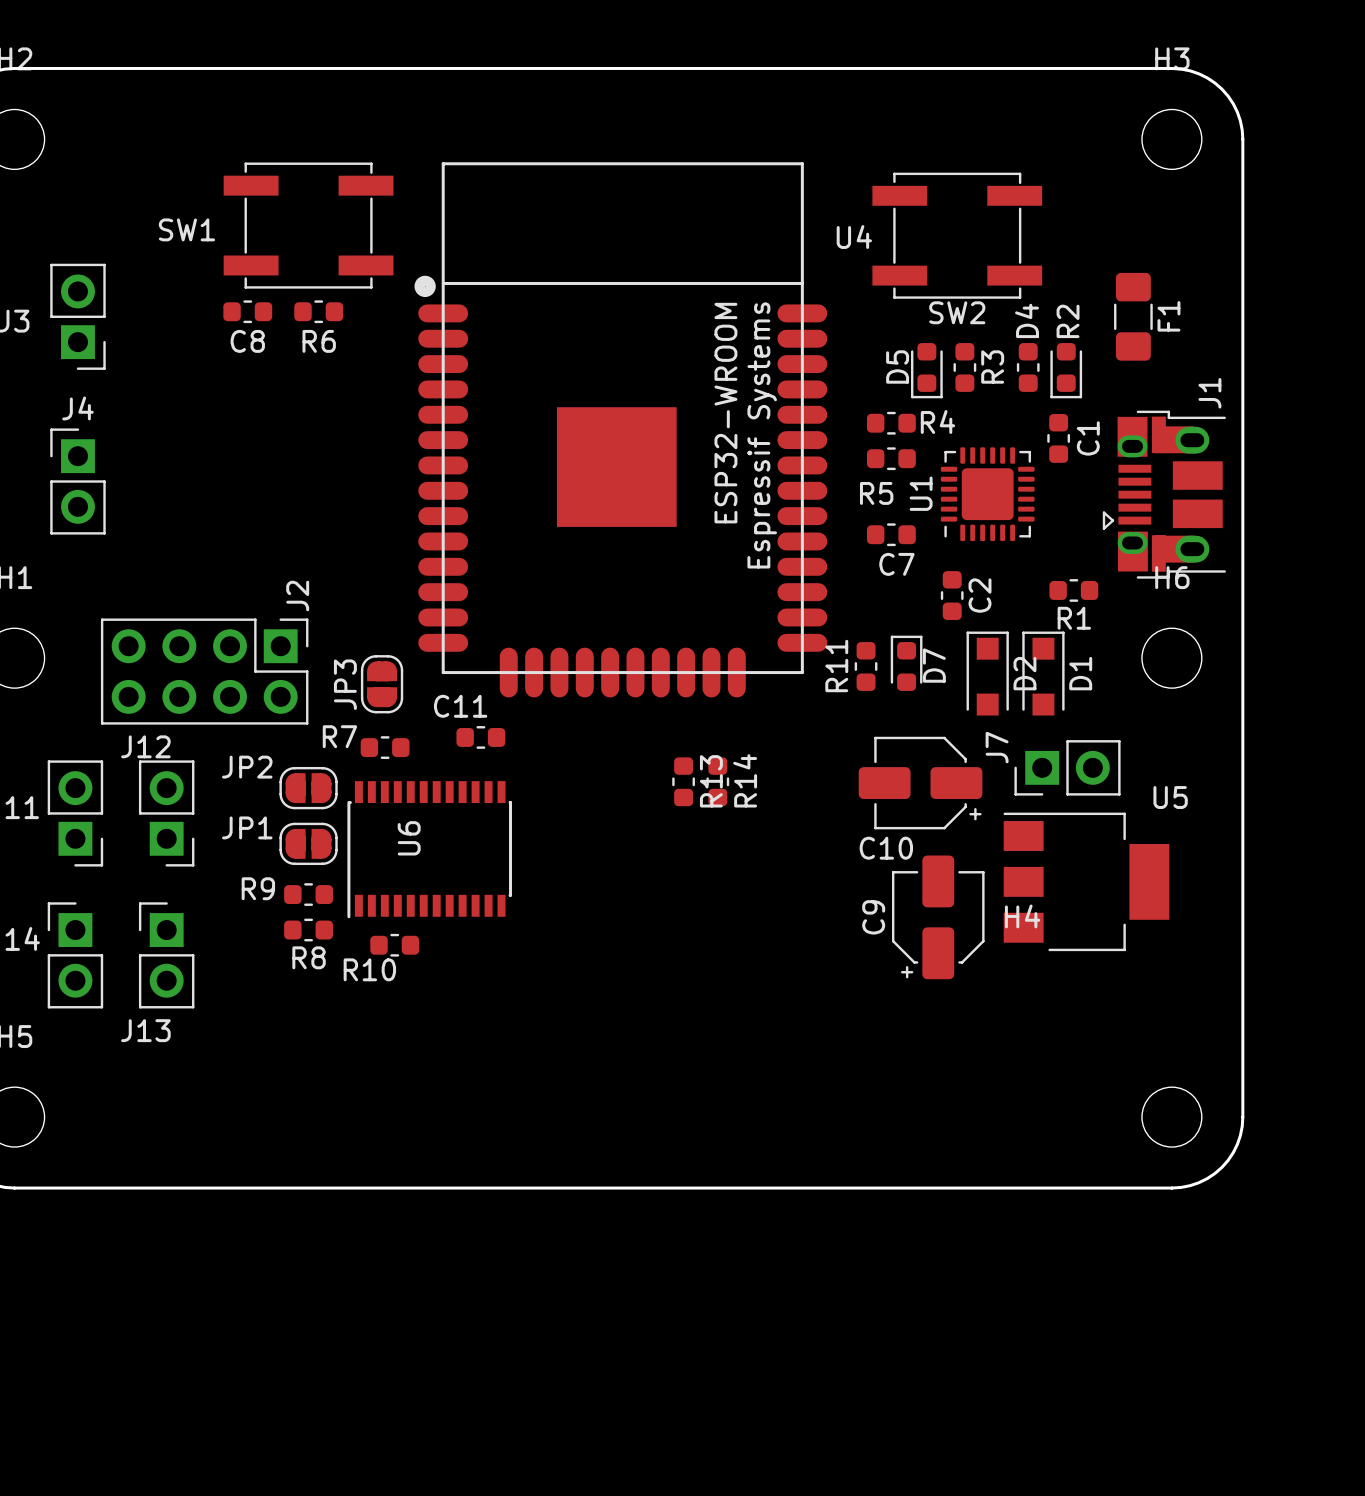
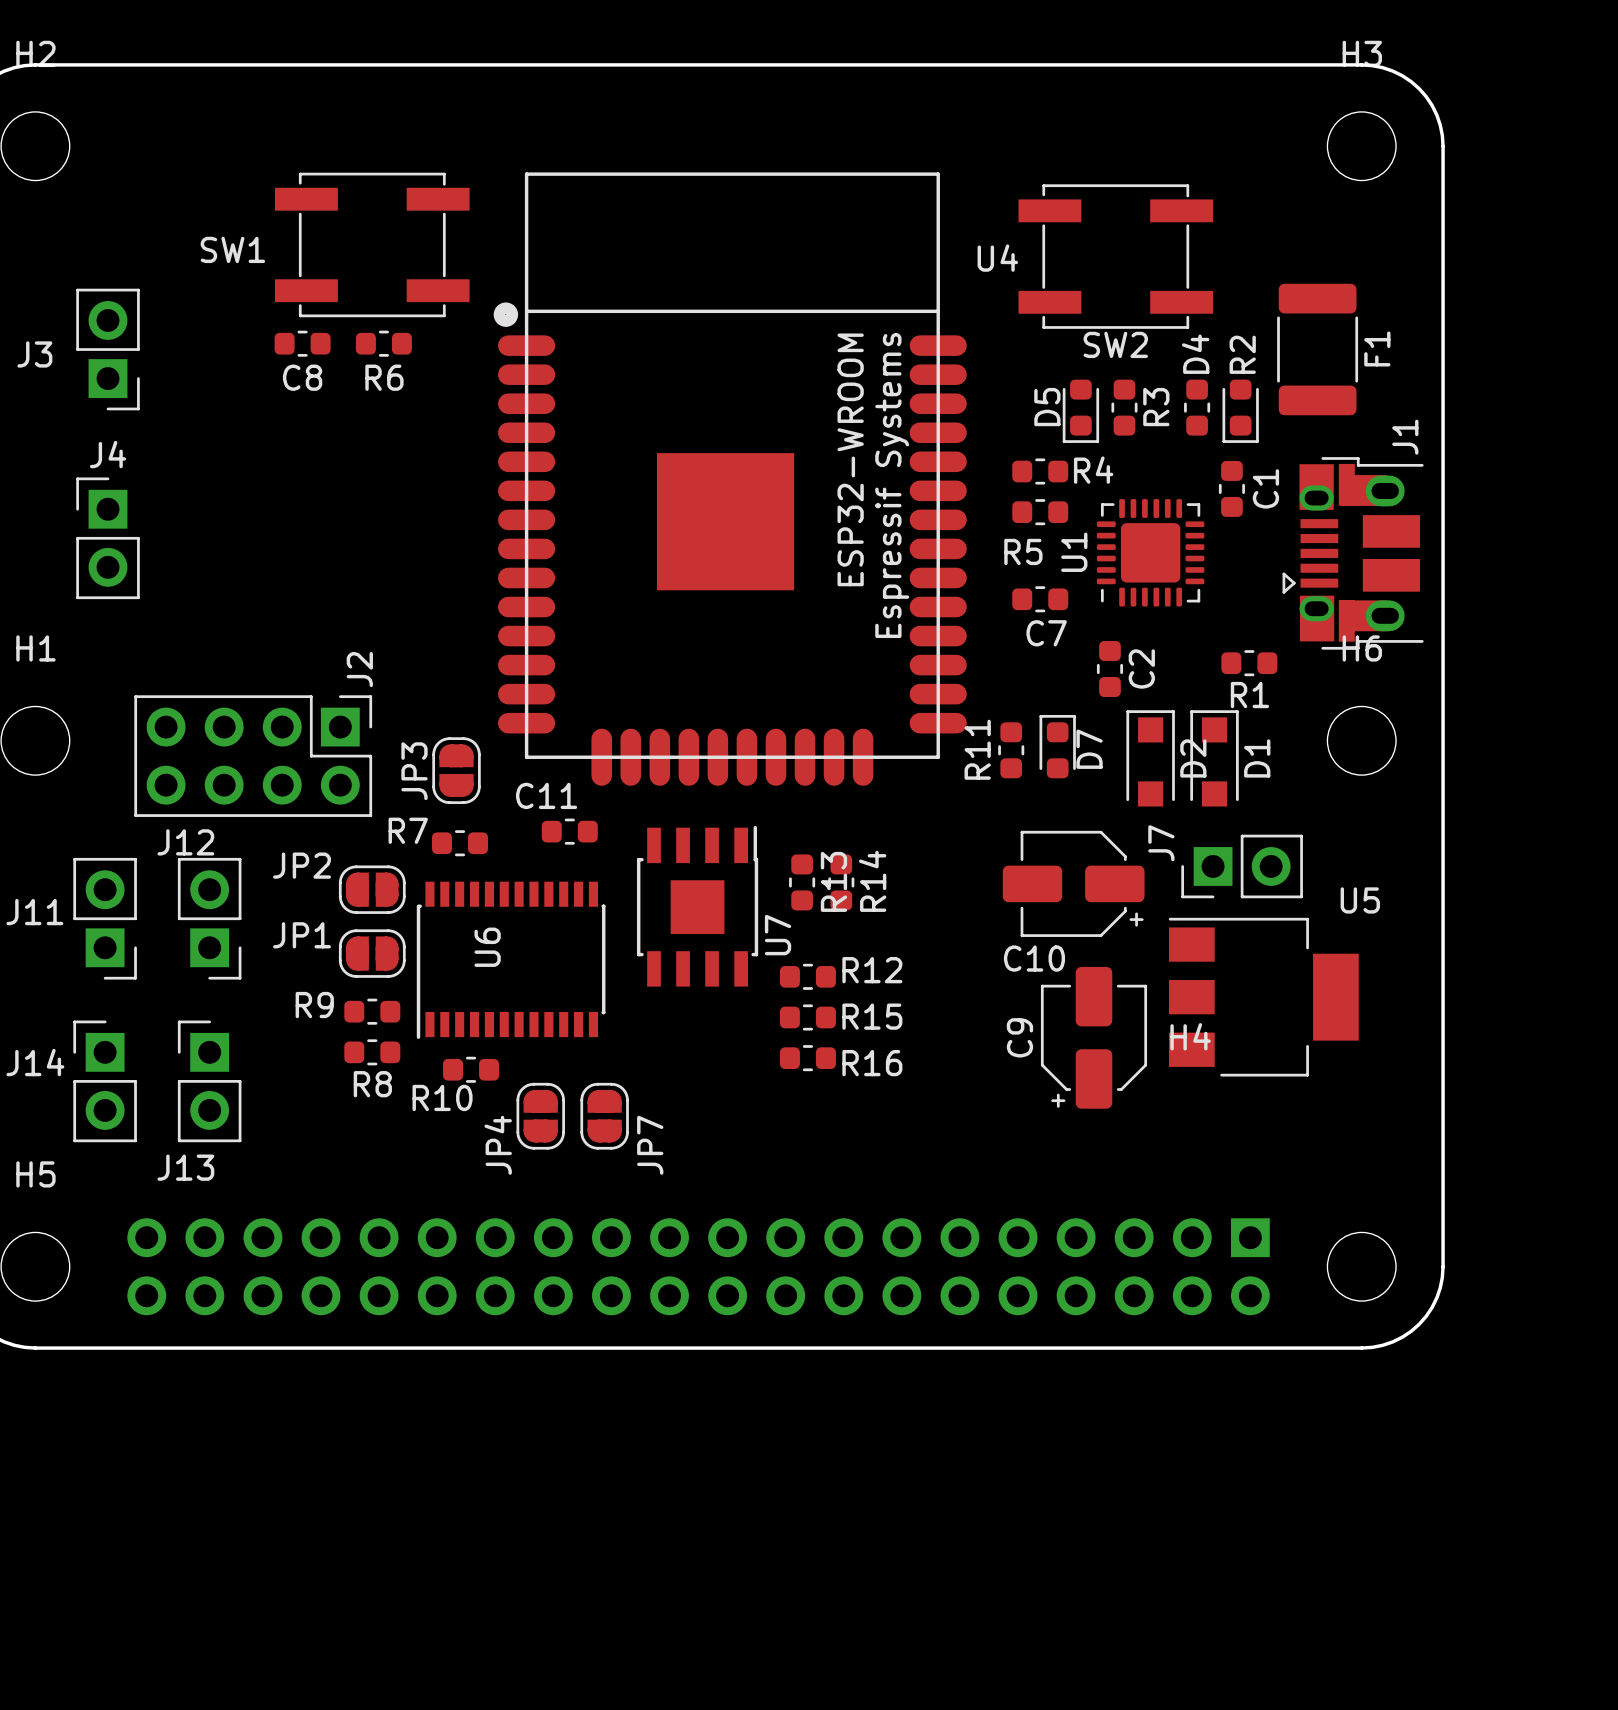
F1 footprint: [1114, 272, 1153, 361] -> [1277, 283, 1359, 416]
U7: none -> (697, 906)
R12: none -> (807, 976)
R15: none -> (807, 1017)
R16: none -> (807, 1058)
JP4: none -> (540, 1116)
JP7: none -> (604, 1116)
part: none -> (698, 1266)

